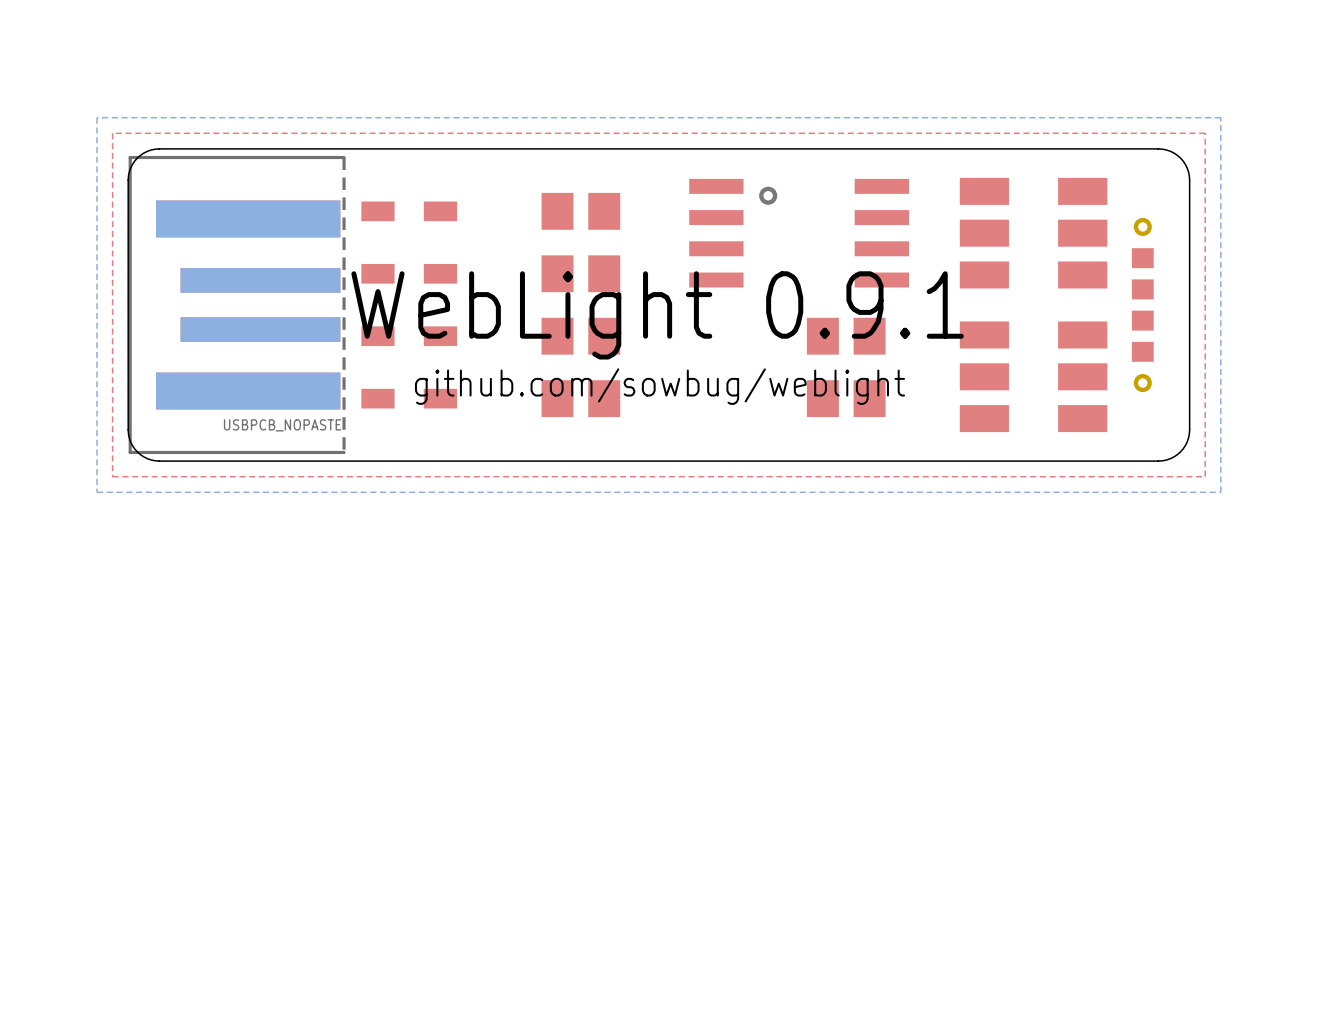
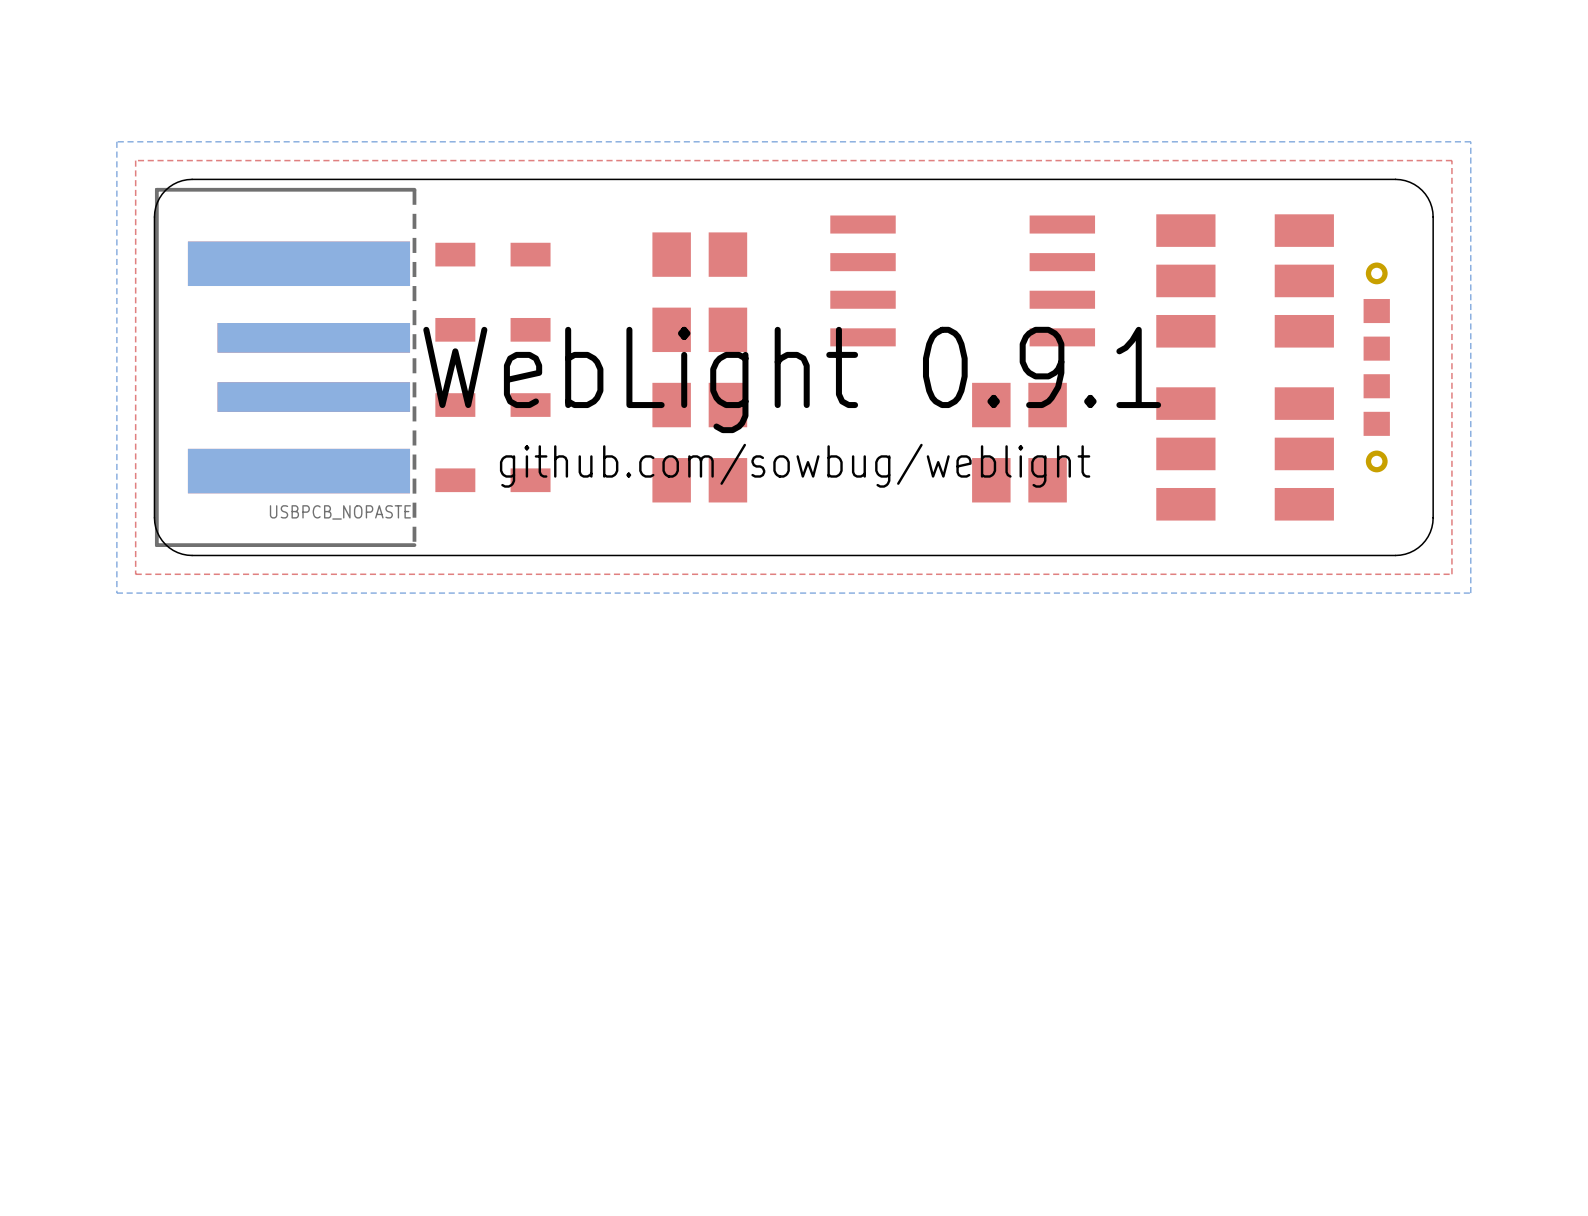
via: (768, 195) -> none

